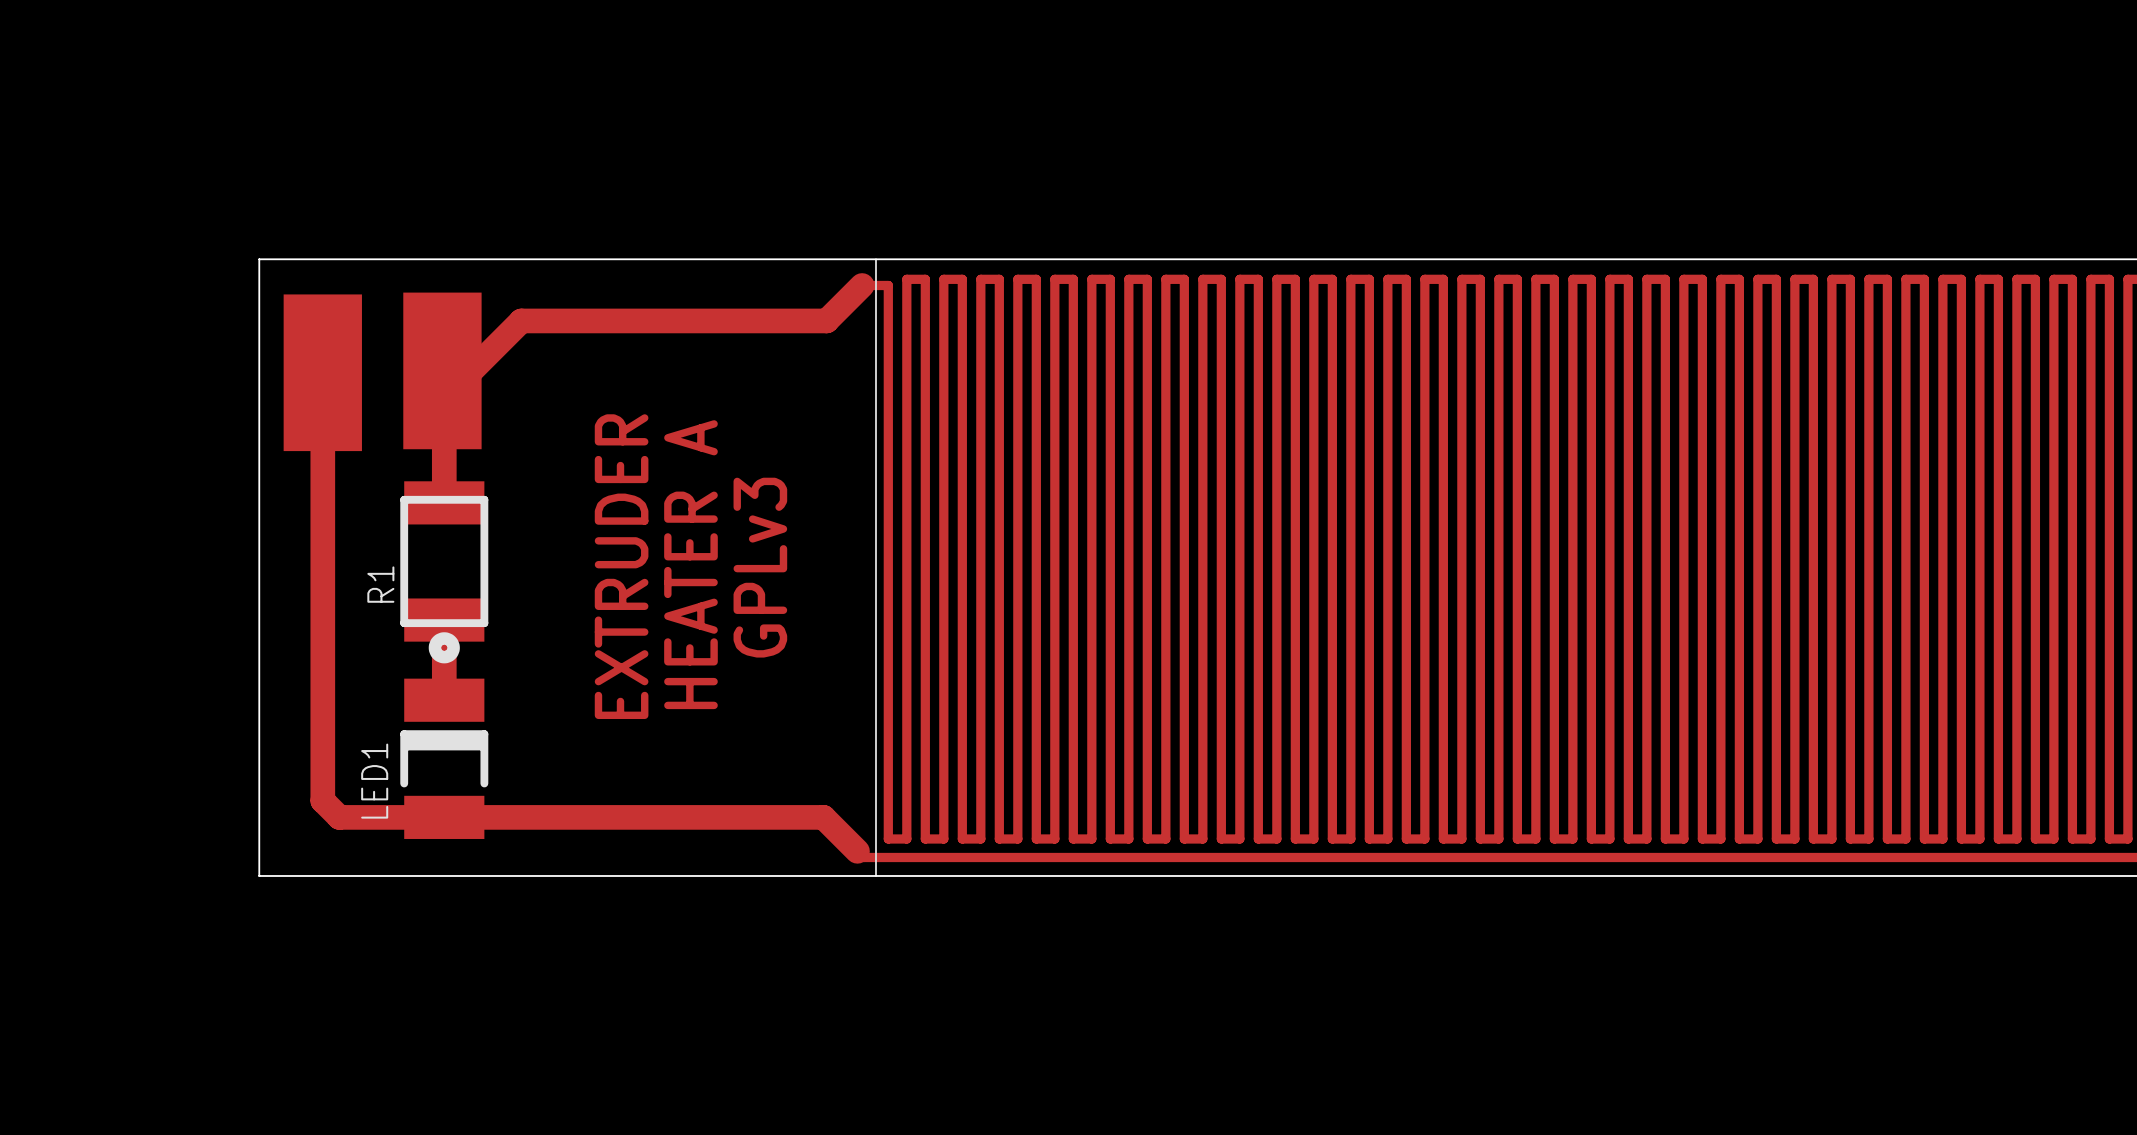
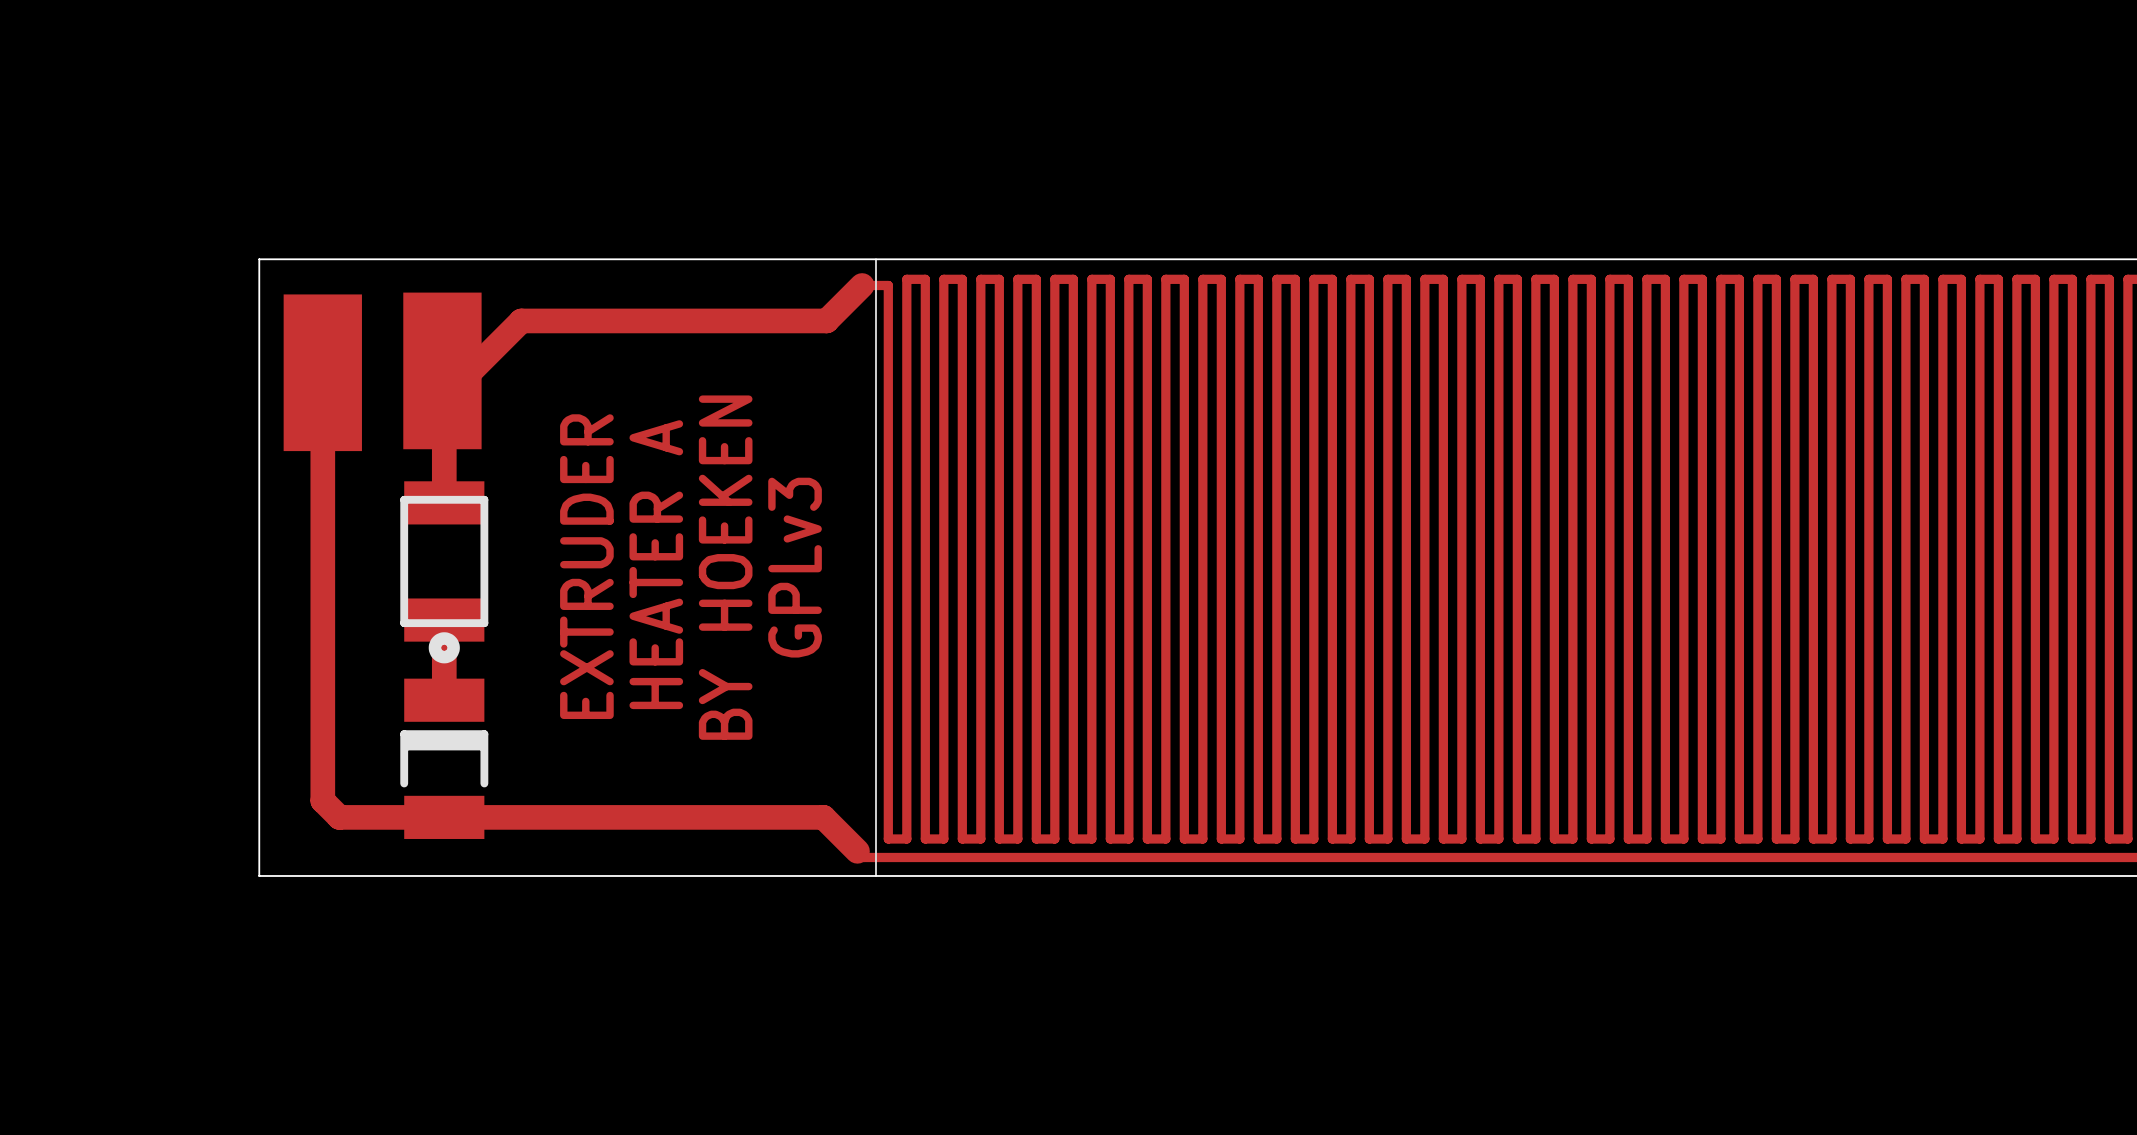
text position: HEATER A (690, 564) -> HEATER A (656, 564)
text position: EXTRUDER (621, 566) -> EXTRUDER (586, 566)
text: none -> BY HOEKEN (725, 567)
text position: GPLv3 (760, 567) -> GPLv3 (795, 567)
R1 name: R1 (380, 584) -> none
LED1 name: LED1 (374, 781) -> none

